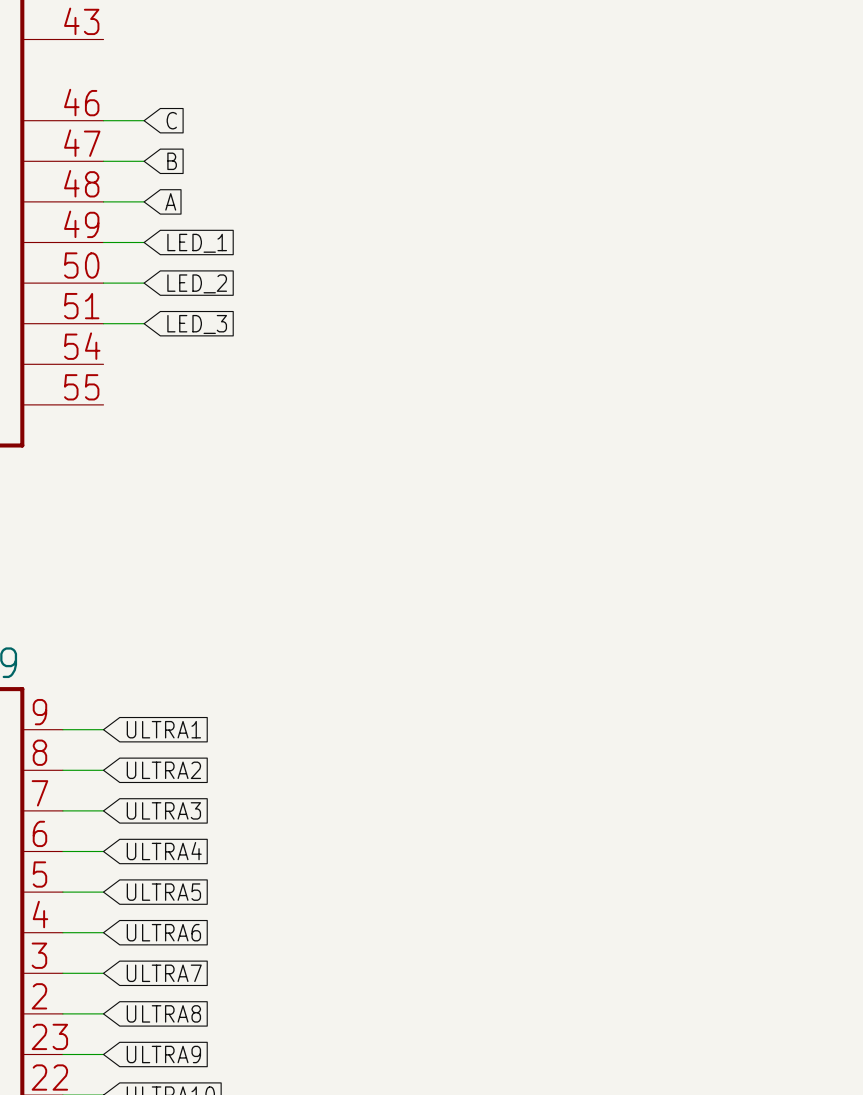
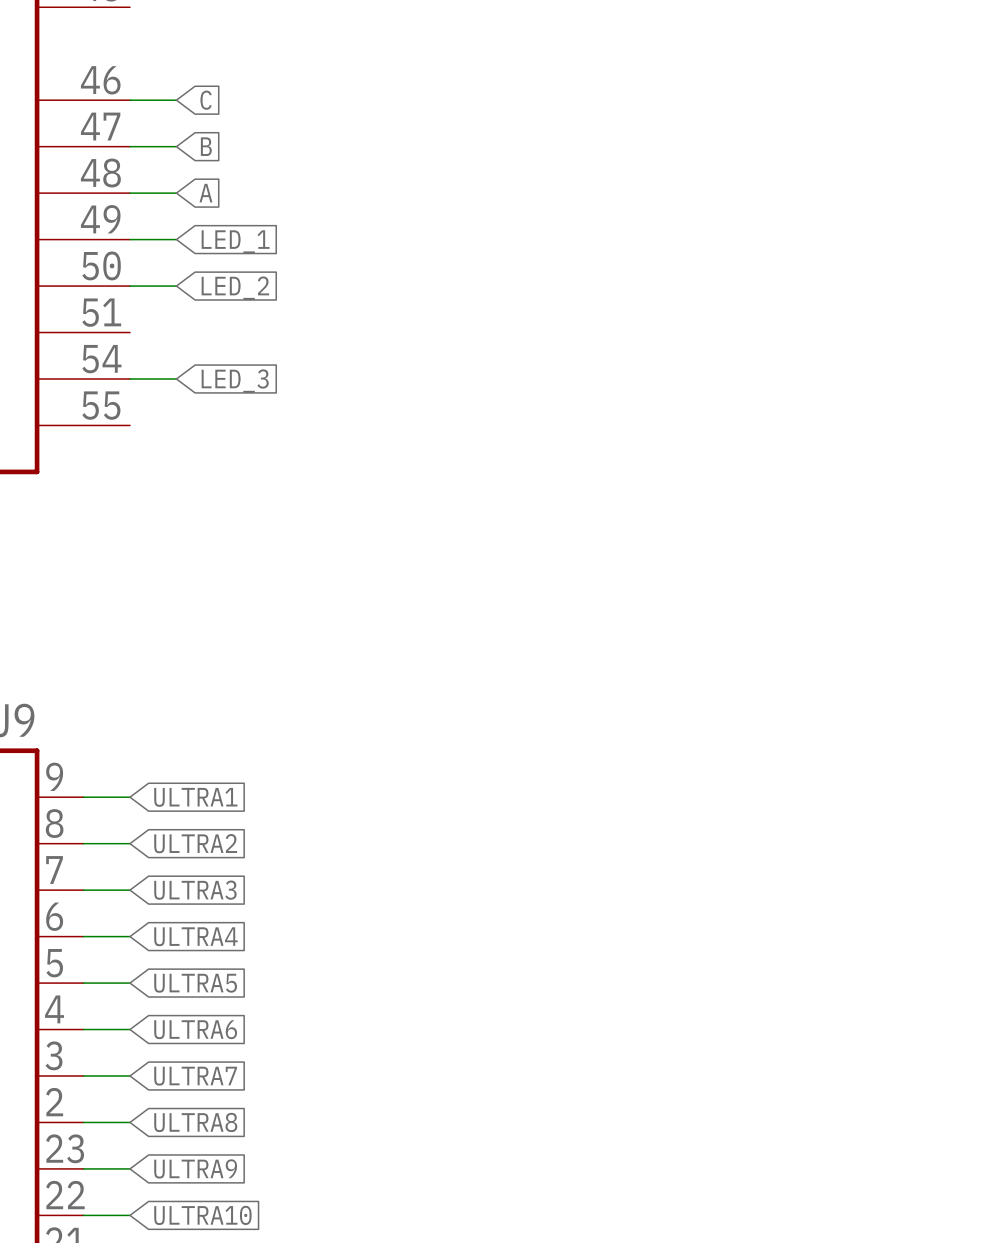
wire: (103, 323) (144, 323) -> (130, 378) (176, 378)
global label position: LED_3 (197, 324) -> LED_3 (235, 381)

